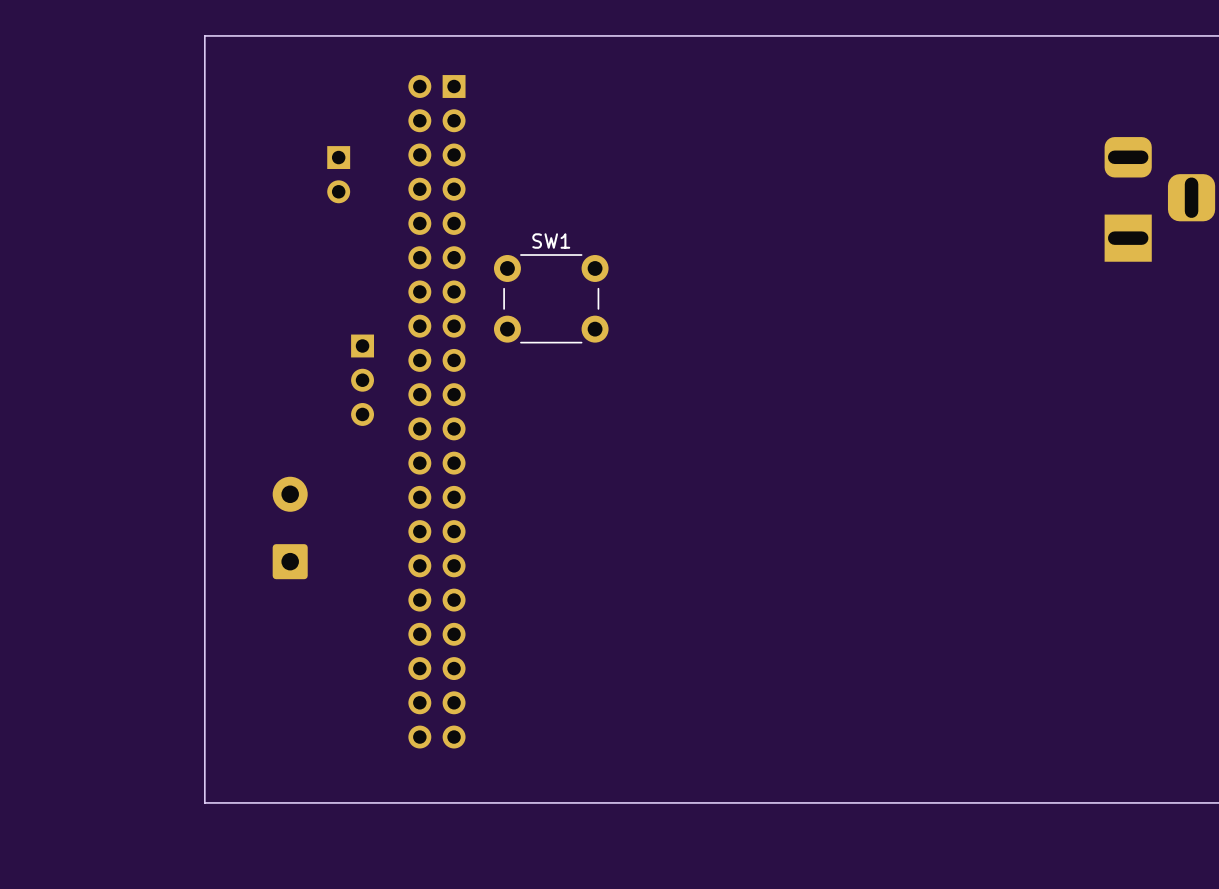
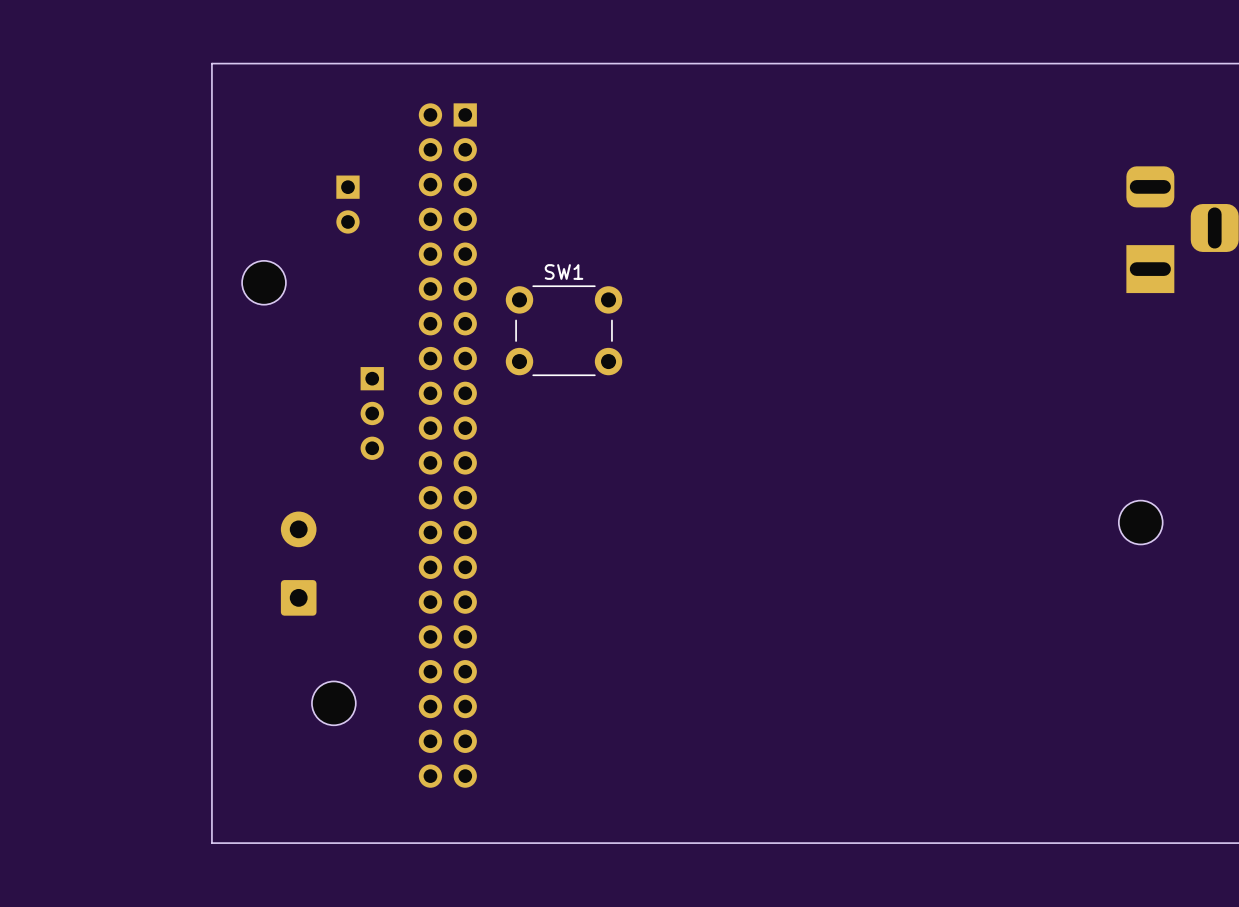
part: none -> (264, 282)
part: none -> (1140, 522)
part: none -> (333, 703)

